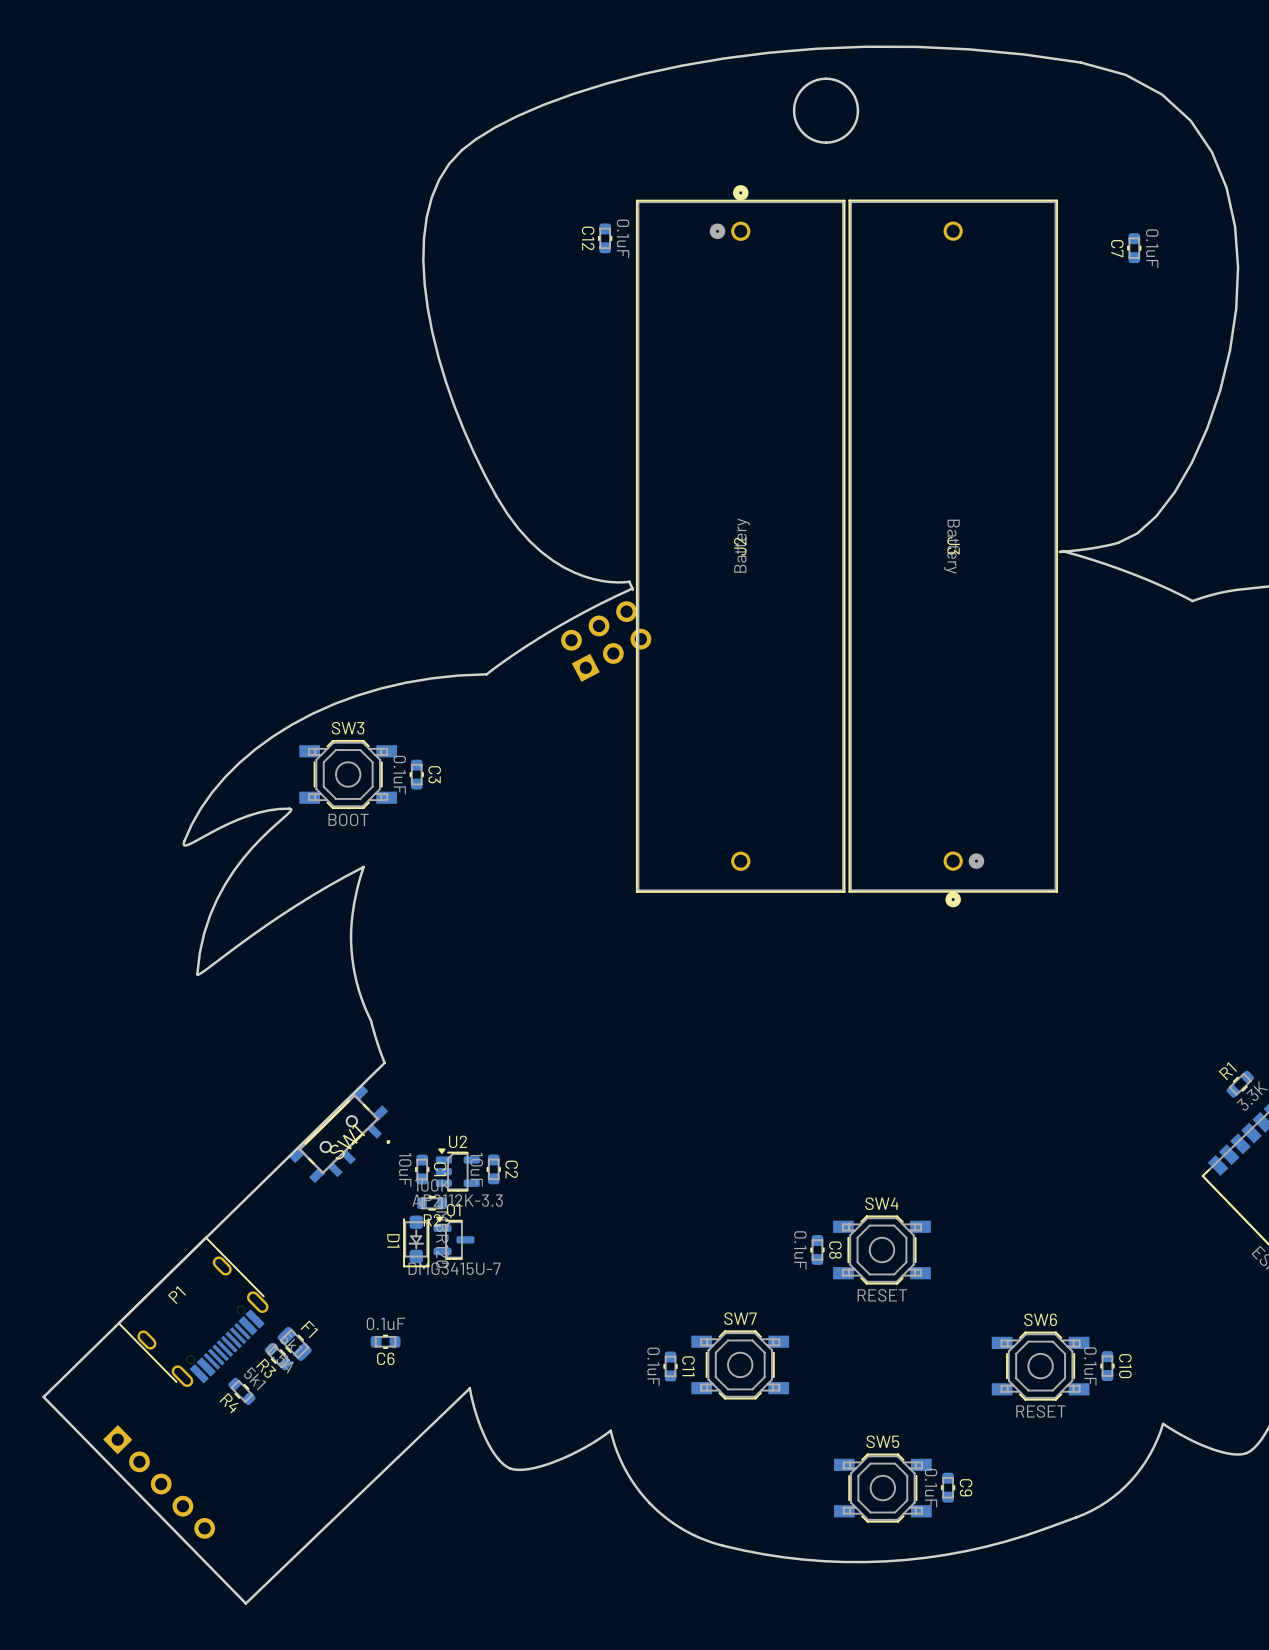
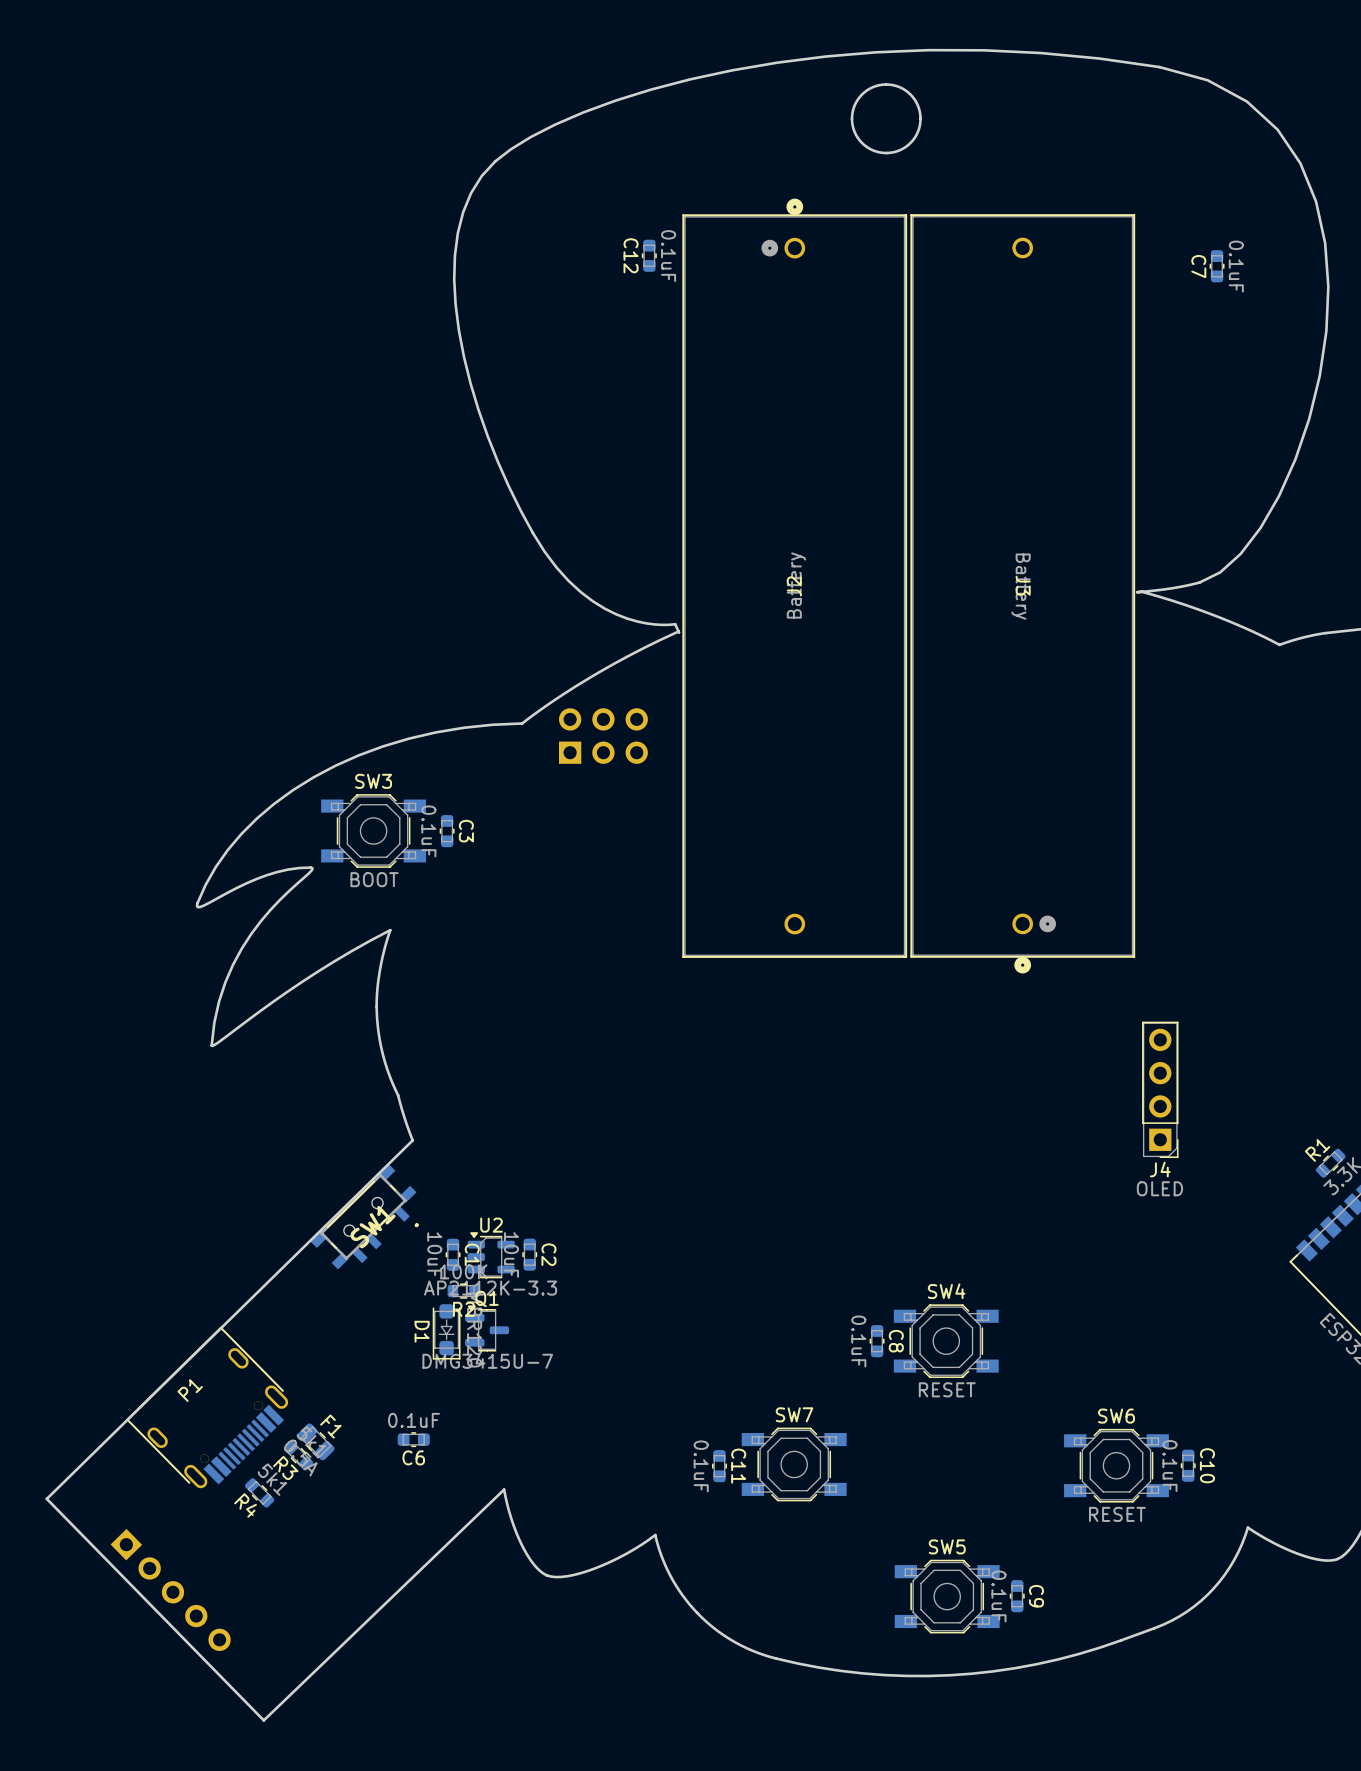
part: (606, 641) -> none
part: none -> (603, 736)
J4: none -> OLED (1160, 1089)

